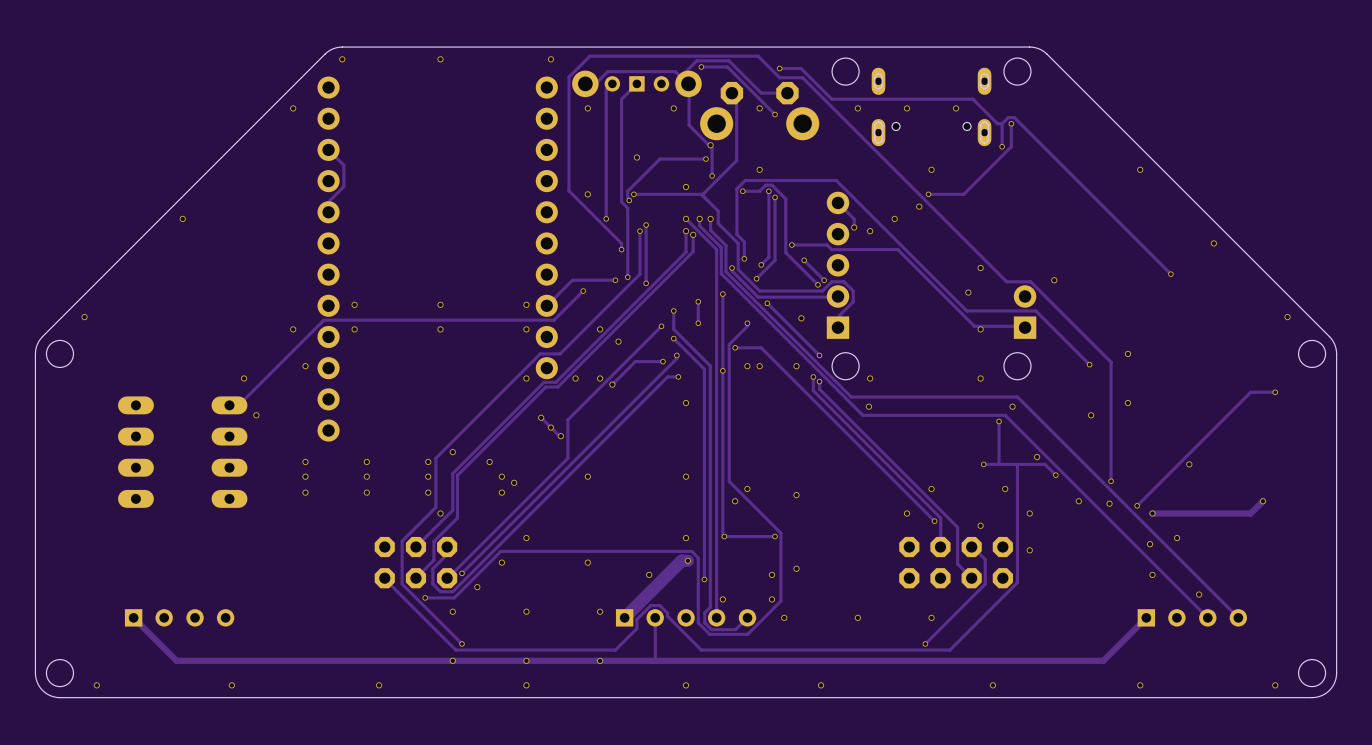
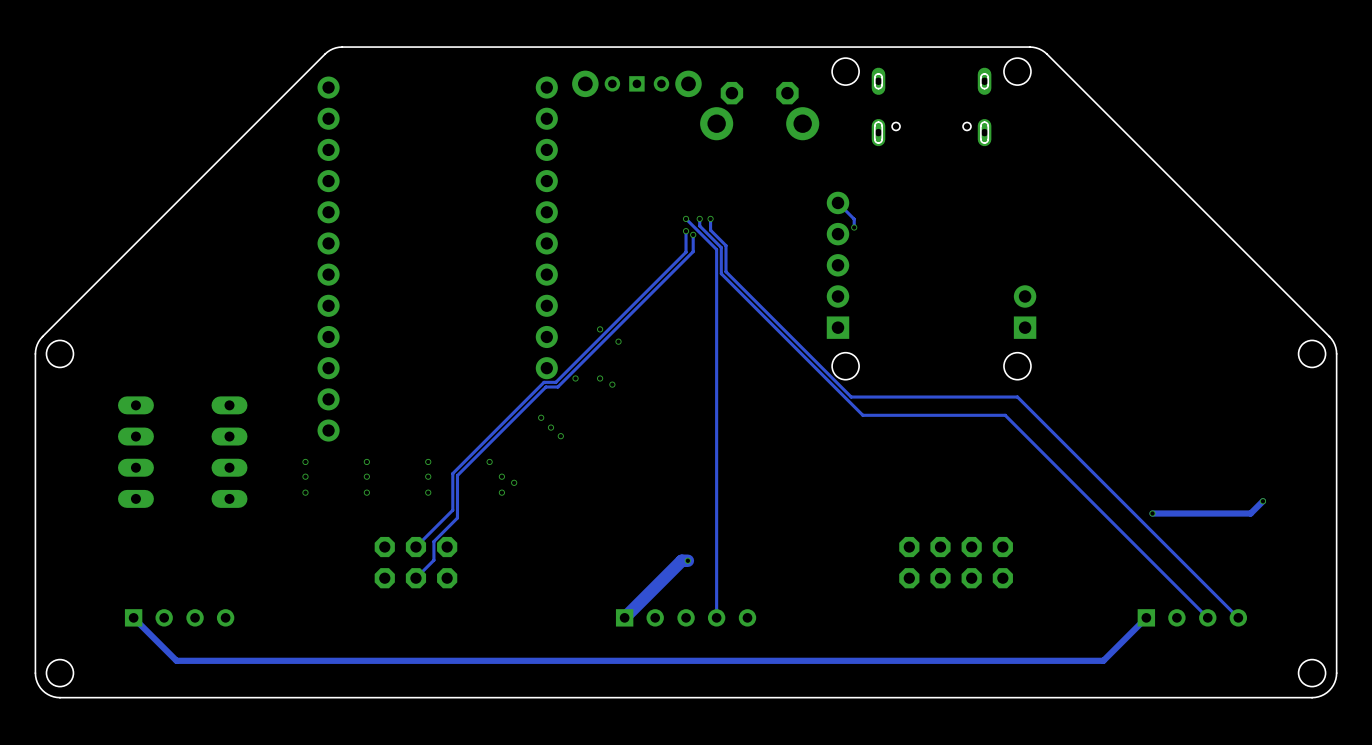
via: (342, 59) -> none
via: (440, 59) -> none
via: (550, 59) -> none
track: (701, 66) (727, 66) (775, 114) -> none
via: (701, 66) -> none
track: (779, 68) (801, 68) (831, 99) (972, 99) (997, 123) (1002, 123) -> none
via: (779, 68) -> none
track: (585, 83) (595, 83) (607, 71) (675, 71) (689, 83) (689, 125) (712, 148) (712, 175) -> none
track: (612, 83) (606, 90) (606, 218) -> none
track: (636, 83) (621, 99) (621, 202) (627, 208) (627, 277) -> none
track: (688, 83) (681, 76) (696, 60) (728, 60) (761, 93) (787, 93) -> none
track: (731, 93) (736, 99) (736, 160) (702, 194) -> none
via: (293, 108) -> none
via: (587, 108) -> none
via: (673, 108) -> none
via: (759, 108) -> none
via: (857, 108) -> none
via: (906, 108) -> none
via: (956, 108) -> none
via: (775, 114) -> none
track: (1002, 123) (1002, 146) -> none
track: (1002, 123) (1008, 117) (1014, 117) (1170, 274) -> none
track: (1011, 123) (1011, 146) (963, 194) (928, 194) -> none
via: (1011, 123) -> none
via: (710, 145) -> none
via: (1002, 146) -> none
track: (328, 149) (343, 165) (343, 186) (330, 200) (328, 212) -> none
via: (636, 157) -> none
track: (705, 159) (659, 159) (627, 191) (629, 200) -> none
via: (705, 159) -> none
via: (759, 169) -> none
via: (931, 169) -> none
via: (1140, 169) -> none
via: (712, 175) -> none
via: (686, 186) -> none
track: (742, 191) (759, 191) (765, 185) (771, 185) (785, 198) (785, 252) (817, 284) -> none
via: (742, 191) -> none
track: (768, 191) (768, 257) (761, 264) -> none
via: (768, 191) -> none
via: (587, 194) -> none
via: (633, 194) -> none
track: (702, 194) (633, 194) -> none
track: (702, 194) (718, 211) (718, 223) (738, 243) (738, 269) (759, 291) (822, 291) (831, 281) (844, 281) (853, 291) (853, 301) (839, 315) (837, 327) -> none
via: (928, 194) -> none
track: (775, 197) (775, 260) (756, 278) -> none
via: (775, 197) -> none
via: (629, 200) -> none
via: (919, 206) -> none
via: (182, 218) -> none
via: (606, 218) -> none
via: (894, 218) -> none
track: (646, 225) (646, 283) -> none
via: (646, 225) -> none
track: (639, 231) (639, 274) (560, 353) (540, 353) (435, 458) (435, 507) (402, 541) (402, 584) (461, 643) -> none
via: (639, 231) -> none
via: (870, 231) -> none
via: (1213, 243) -> none
track: (791, 244) (827, 244) (831, 249) (897, 249) (974, 326) (1025, 327) -> none
via: (791, 244) -> none
track: (621, 249) (621, 243) (568, 190) (568, 77) (589, 56) (758, 56) (779, 77) (802, 77) (1006, 281) (1030, 281) (1111, 362) (1111, 481) -> none
via: (621, 249) -> none
track: (744, 258) (744, 241) (736, 234) (736, 188) (745, 180) (836, 180) (966, 310) (1035, 310) (1089, 364) -> none
via: (744, 258) -> none
track: (804, 260) (824, 280) -> none
via: (804, 260) -> none
via: (761, 264) -> none
track: (732, 268) (732, 271) (758, 297) (837, 296) -> none
via: (732, 268) -> none
via: (980, 268) -> none
via: (1170, 274) -> none
via: (627, 277) -> none
via: (756, 278) -> none
track: (615, 280) (572, 280) (546, 305) -> none
via: (615, 280) -> none
via: (824, 280) -> none
via: (1054, 280) -> none
via: (646, 283) -> none
via: (817, 284) -> none
track: (583, 291) (554, 320) (323, 320) (239, 404) (229, 405) -> none
via: (583, 291) -> none
via: (968, 292) -> none
track: (722, 294) (722, 536) (775, 536) -> none
via: (722, 294) -> none
track: (698, 301) (698, 323) -> none
via: (698, 301) -> none
track: (767, 303) (819, 355) -> none
via: (767, 303) -> none
via: (354, 304) -> none
via: (440, 304) -> none
via: (526, 304) -> none
track: (673, 310) (673, 329) (710, 365) (710, 607) (704, 612) (704, 622) (711, 629) (735, 629) (747, 617) -> none
via: (673, 310) -> none
via: (84, 317) -> none
via: (1287, 317) -> none
via: (801, 318) -> none
via: (698, 323) -> none
track: (747, 323) (747, 326) (729, 344) (729, 481) (780, 533) (780, 601) (747, 634) (709, 634) (698, 622) (698, 557) (691, 551) (500, 551) (454, 597) (425, 597) -> none
via: (747, 323) -> none
track: (661, 326) (567, 419) (567, 458) (447, 578) -> none
via: (661, 326) -> none
via: (293, 329) -> none
via: (354, 329) -> none
via: (440, 329) -> none
via: (526, 329) -> none
via: (980, 329) -> none
track: (673, 338) (704, 369) (704, 579) -> none
via: (673, 338) -> none
track: (735, 347) (761, 347) (934, 521) -> none
via: (735, 347) -> none
via: (1127, 353) -> none
track: (676, 355) (676, 358) (461, 573) -> none
via: (676, 355) -> none
via: (819, 355) -> none
track: (663, 361) (635, 361) (612, 384) -> none
via: (663, 361) -> none
via: (1089, 364) -> none
via: (305, 366) -> none
via: (747, 366) -> none
via: (759, 366) -> none
via: (796, 366) -> none
via: (722, 370) -> none
track: (678, 376) (667, 376) (452, 591) (440, 591) (432, 584) (432, 568) (446, 554) (447, 547) -> none
via: (678, 376) -> none
track: (813, 376) (813, 390) (940, 518) (940, 547) -> none
via: (813, 376) -> none
via: (244, 378) -> none
via: (526, 378) -> none
via: (870, 378) -> none
via: (980, 378) -> none
track: (819, 381) (819, 389) (957, 527) (957, 564) (971, 578) -> none
via: (819, 381) -> none
track: (1275, 392) (1250, 392) (1137, 505) -> none
via: (1275, 392) -> none
via: (686, 403) -> none
via: (1127, 403) -> none
via: (868, 406) -> none
via: (1012, 406) -> none
via: (256, 415) -> none
via: (1091, 415) -> none
track: (541, 417) (560, 436) -> none
track: (999, 421) (999, 464) -> none
via: (999, 421) -> none
via: (452, 452) -> none
via: (1037, 457) -> none
track: (983, 464) (1045, 464) (1055, 475) -> none
via: (983, 464) -> none
track: (1017, 464) (1017, 582) (949, 650) (701, 650) (667, 616) (667, 613) (659, 605) (650, 605) (636, 619) (636, 628) (615, 650) (455, 650) (384, 578) -> none
via: (1189, 464) -> none
via: (1055, 475) -> none
via: (587, 476) -> none
via: (686, 476) -> none
via: (1111, 481) -> none
via: (747, 488) -> none
via: (931, 488) -> none
via: (1005, 488) -> none
via: (796, 495) -> none
via: (735, 501) -> none
via: (1078, 501) -> none
via: (1109, 503) -> none
via: (1137, 505) -> none
via: (440, 513) -> none
via: (906, 513) -> none
via: (1029, 513) -> none
via: (934, 521) -> none
via: (980, 525) -> none
via: (724, 536) -> none
via: (775, 536) -> none
via: (526, 538) -> none
via: (686, 538) -> none
via: (1177, 538) -> none
via: (1150, 544) -> none
track: (971, 547) (985, 559) (985, 584) (925, 643) -> none
via: (1029, 550) -> none
via: (501, 562) -> none
via: (587, 562) -> none
via: (796, 568) -> none
via: (461, 573) -> none
via: (649, 574) -> none
via: (771, 574) -> none
via: (1152, 574) -> none
via: (704, 579) -> none
via: (477, 587) -> none
via: (1199, 594) -> none
via: (425, 597) -> none
via: (722, 599) -> none
via: (771, 599) -> none
via: (452, 611) -> none
via: (526, 611) -> none
via: (600, 611) -> none
track: (655, 617) (655, 660) -> none
via: (784, 617) -> none
via: (857, 617) -> none
via: (931, 617) -> none
via: (461, 643) -> none
via: (925, 643) -> none
via: (452, 660) -> none
via: (526, 660) -> none
via: (600, 660) -> none
via: (96, 685) -> none
via: (231, 685) -> none
via: (379, 685) -> none
via: (526, 685) -> none
via: (686, 685) -> none
via: (821, 685) -> none
via: (992, 685) -> none
via: (1140, 685) -> none
via: (1275, 685) -> none

